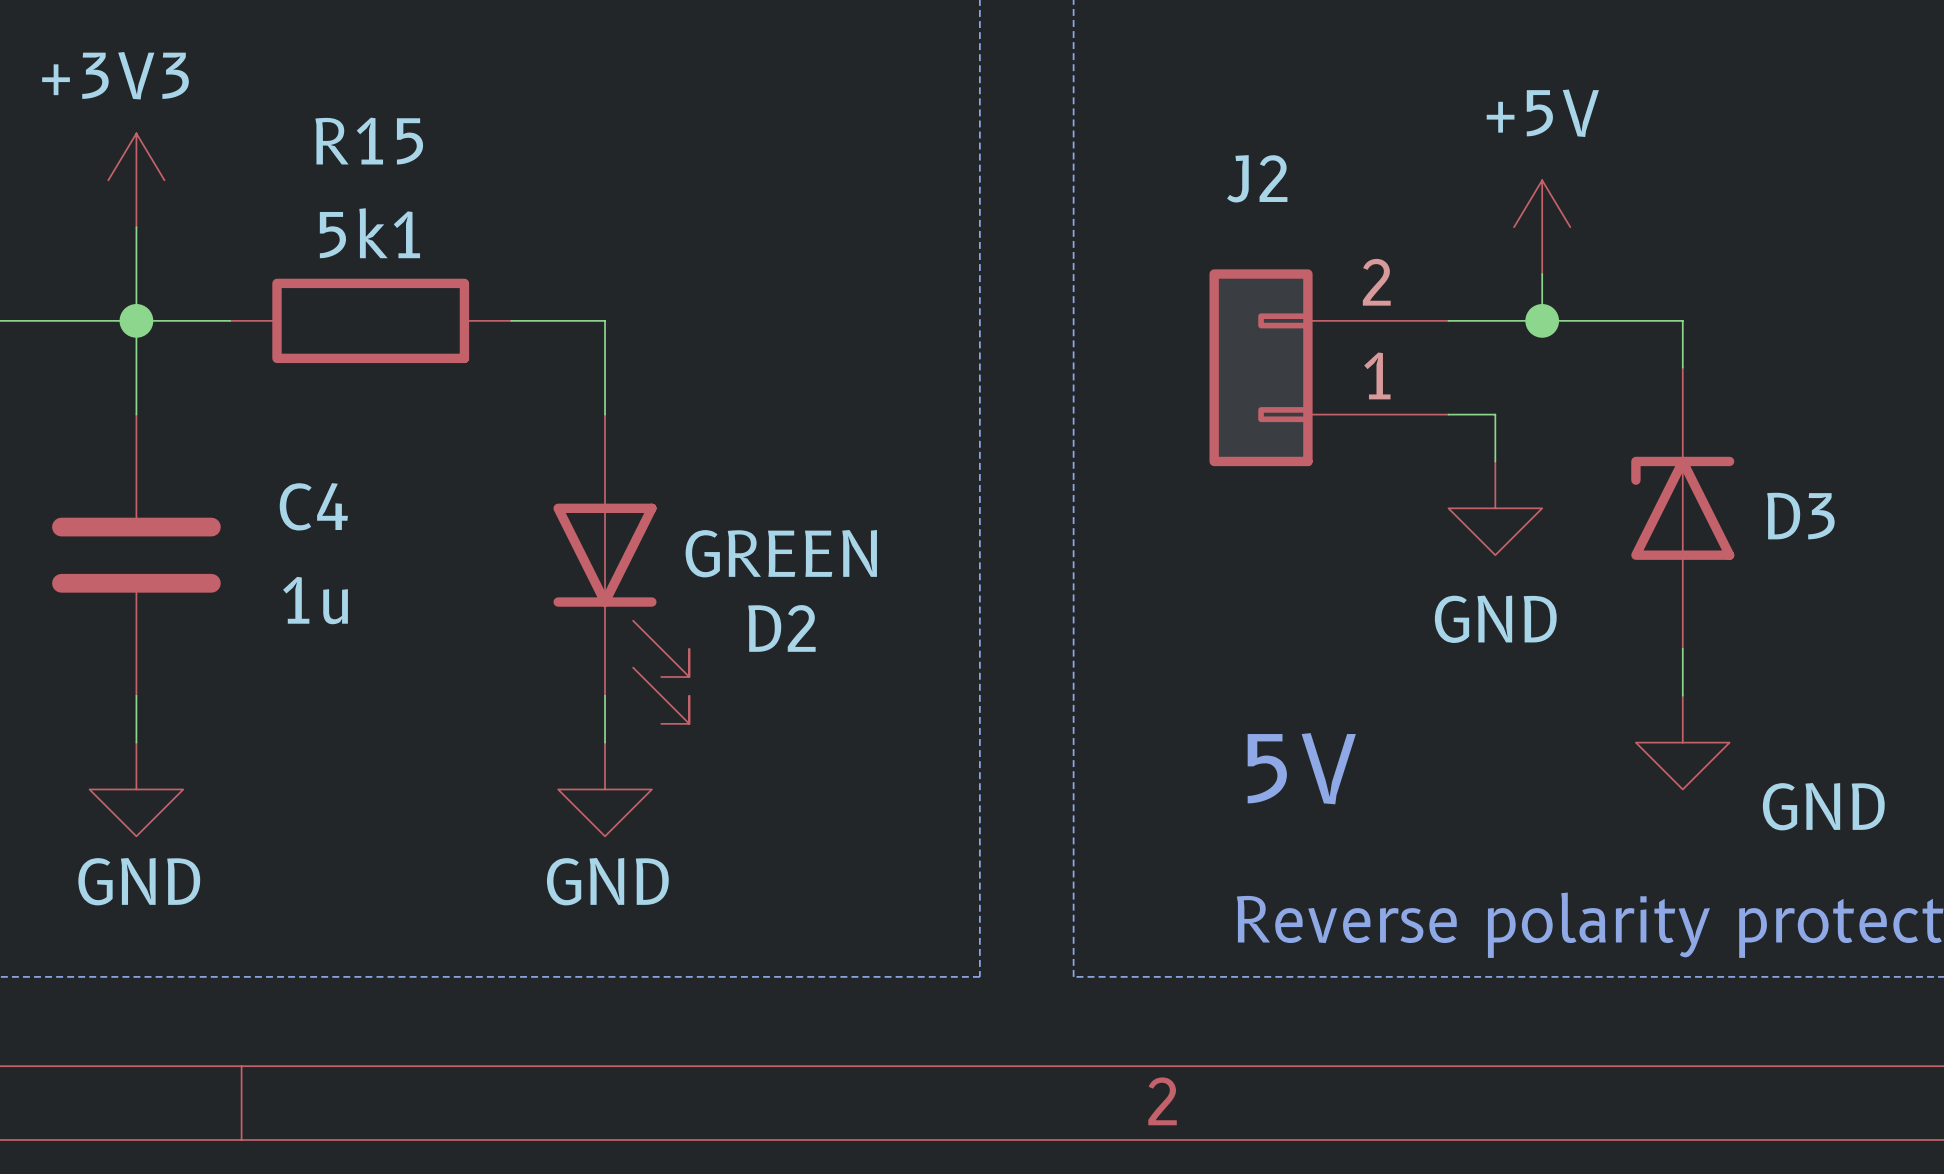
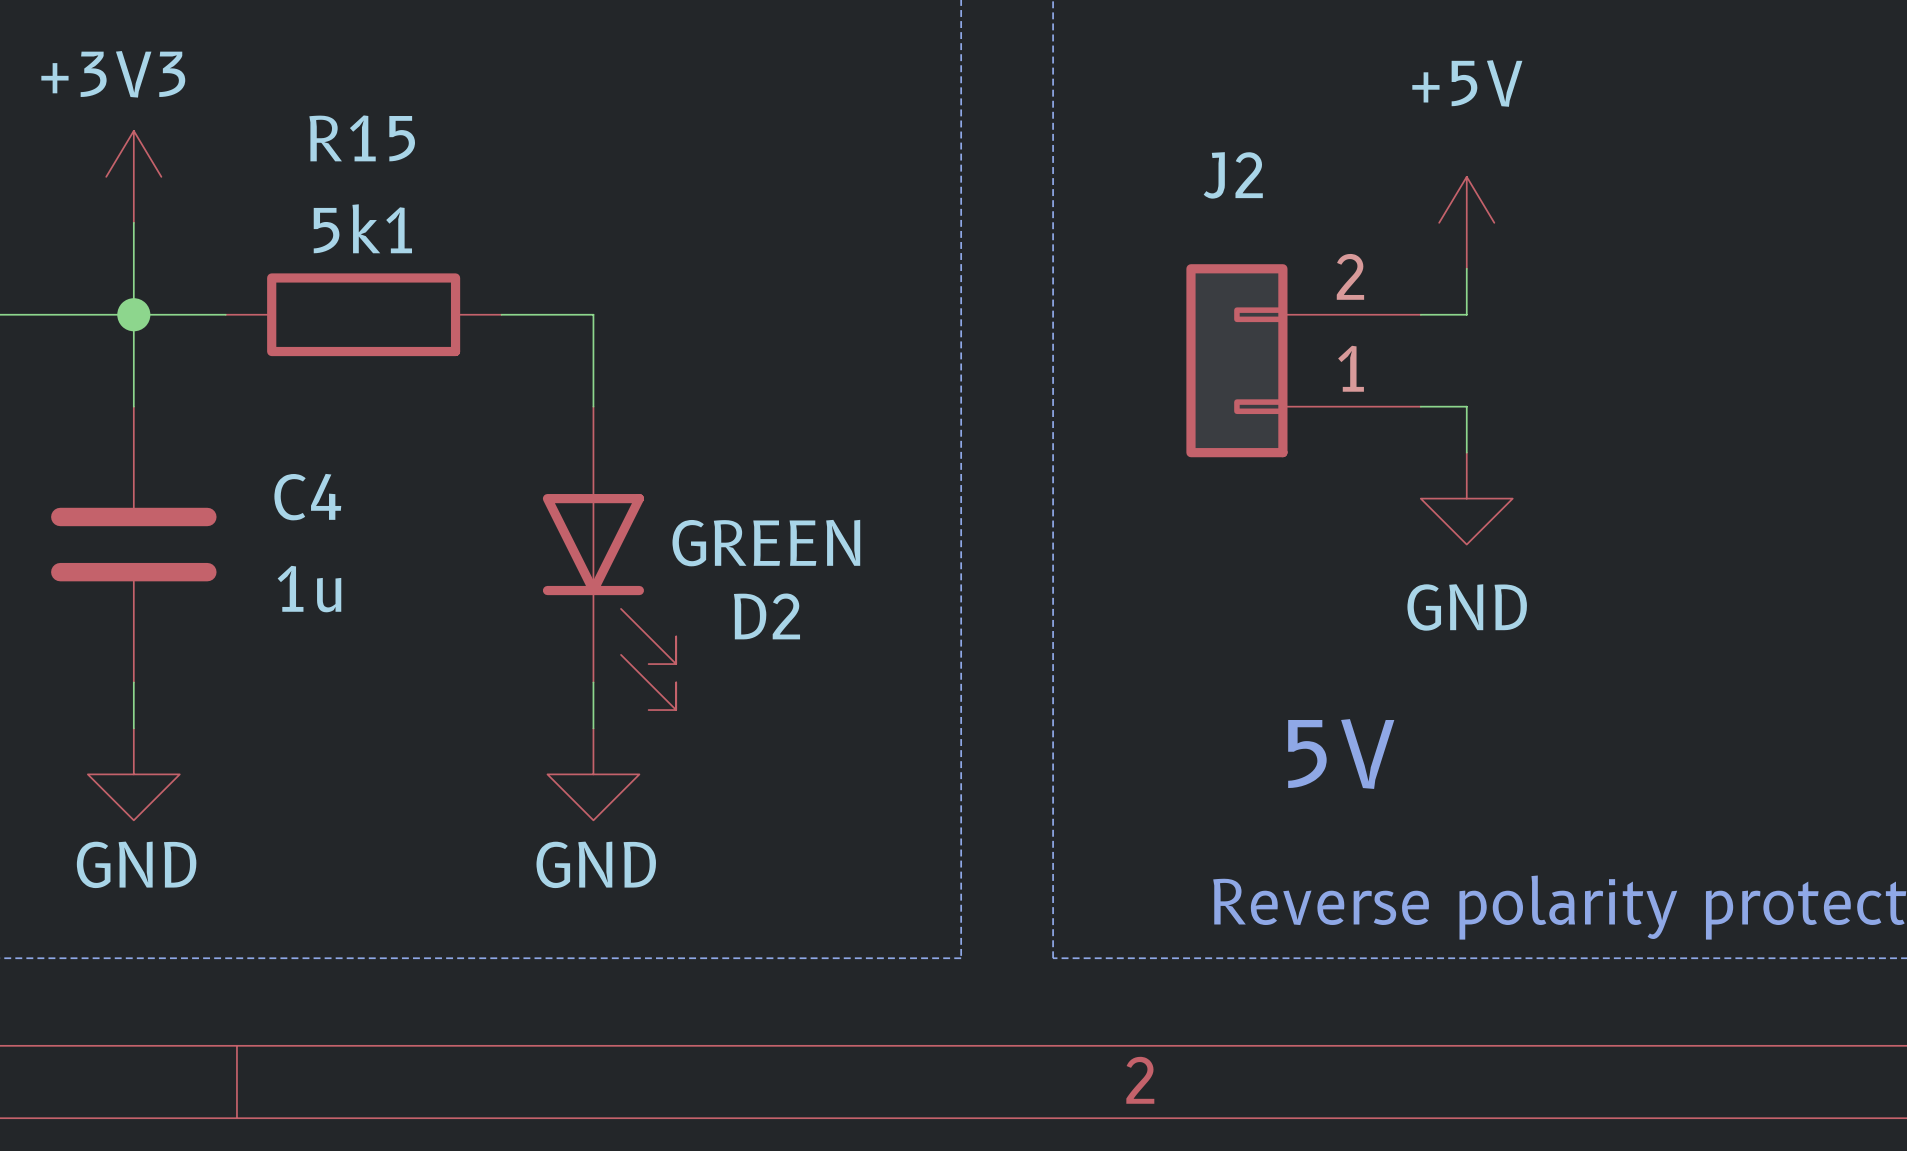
power symbol text position: +5V (1542, 113) -> +5V (1467, 83)
power symbol position: +5V (1542, 227) -> +5V (1466, 222)
wire: (1542, 274) (1542, 320) -> none
wire: (1495, 320) (1682, 320) (1682, 367) -> (1466, 314) (1466, 268)
junction: (1542, 320) -> none
D3: (1682, 508) -> none
wire: (1682, 648) (1682, 695) -> none
power symbol: GND (1682, 742) -> none
text position: 5V (1301, 768) -> 5V (1341, 754)

